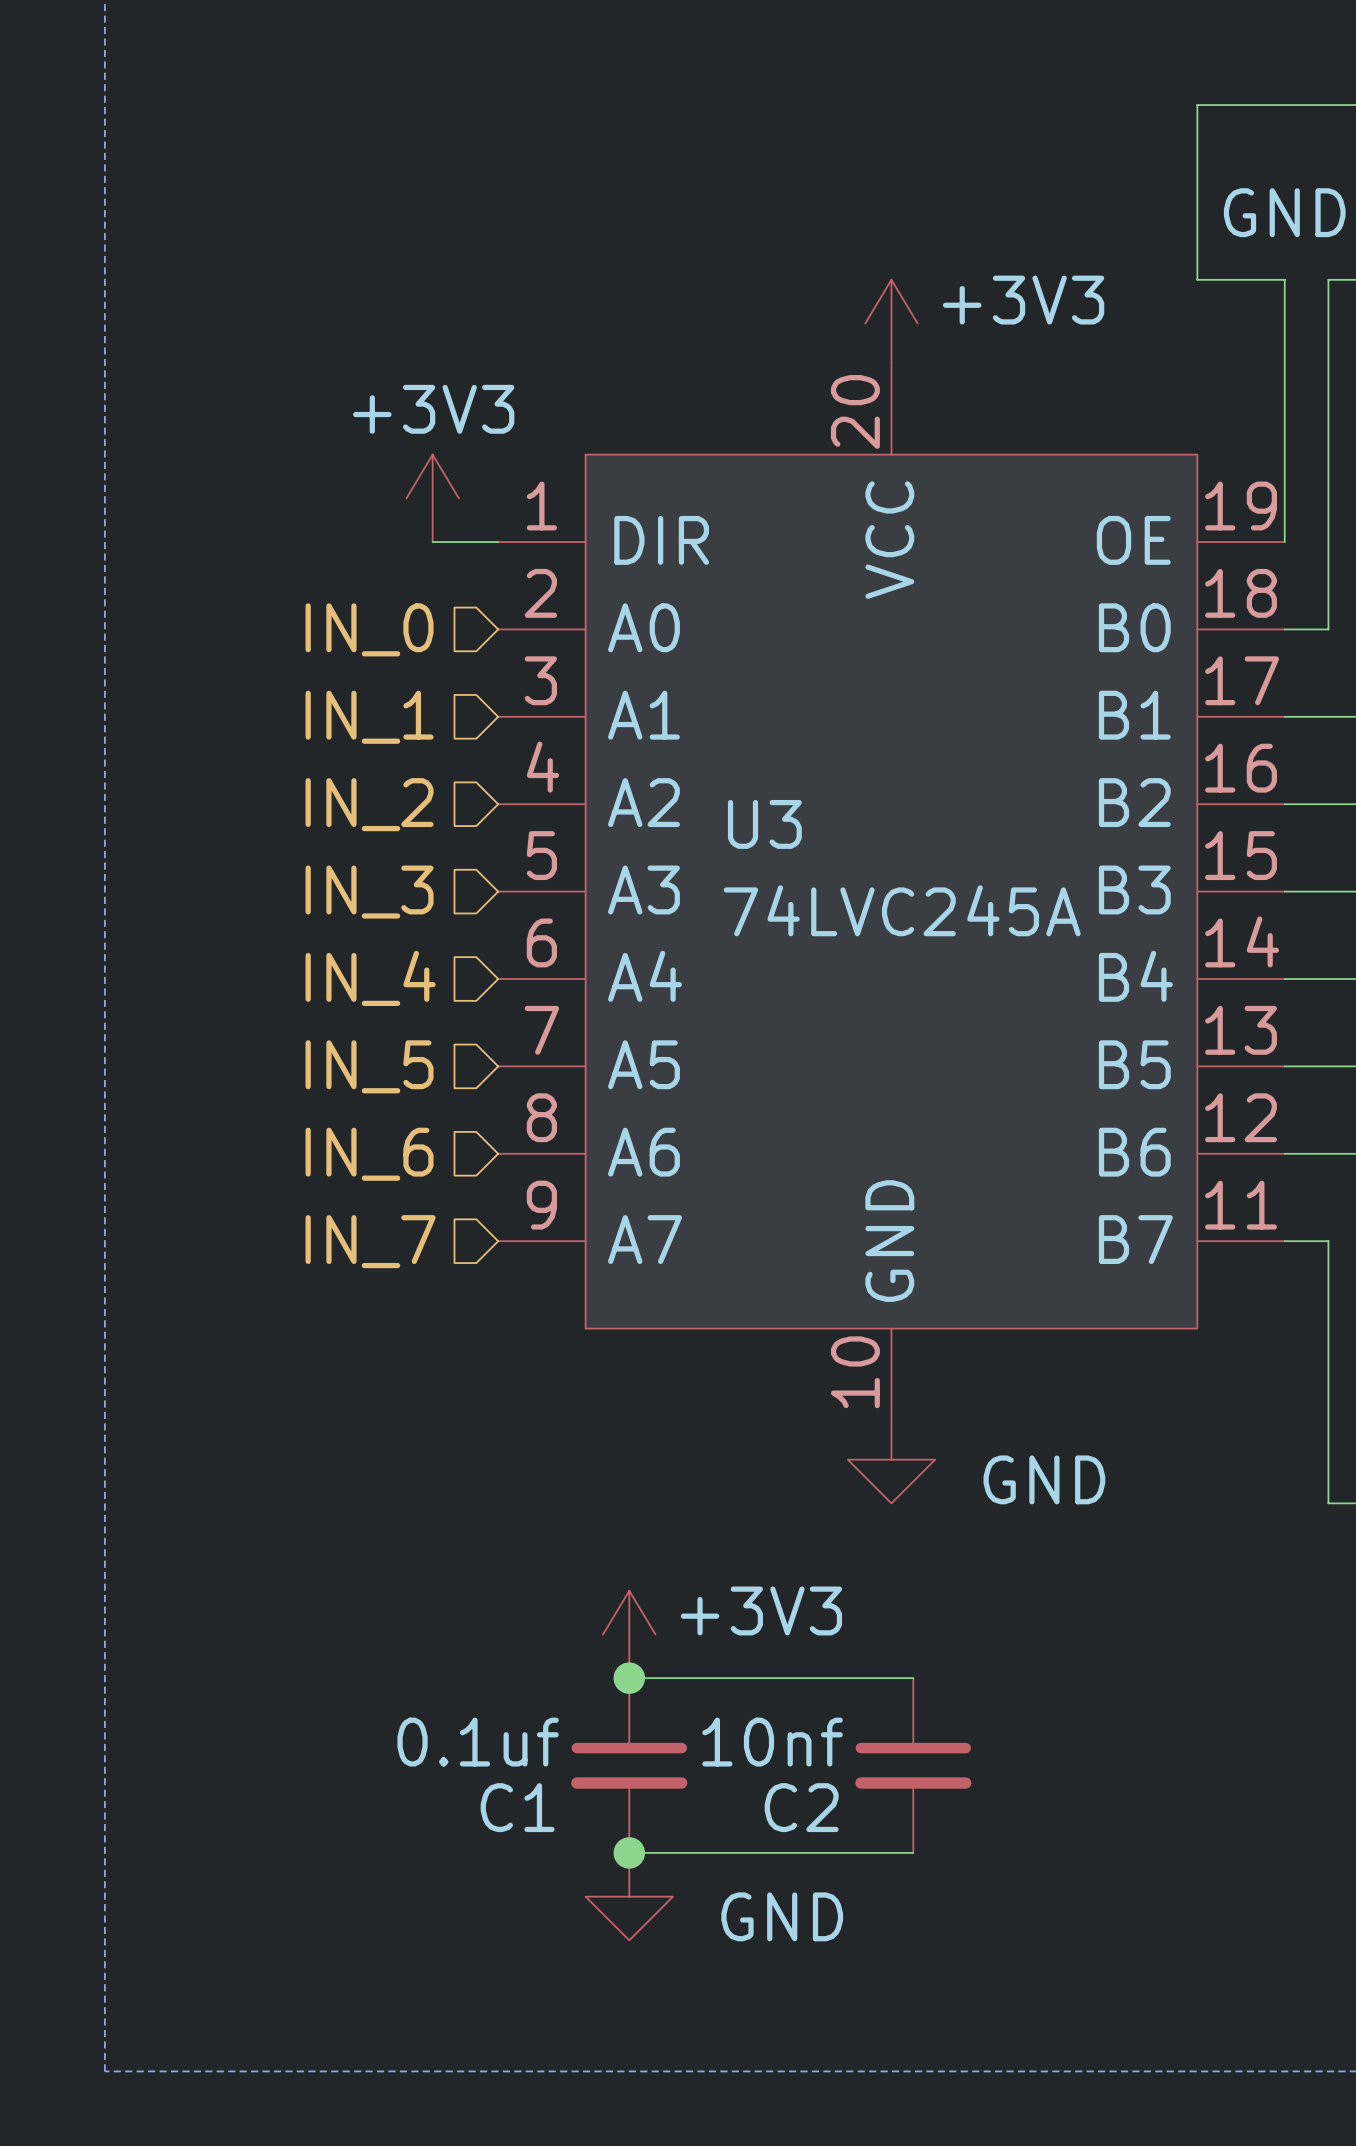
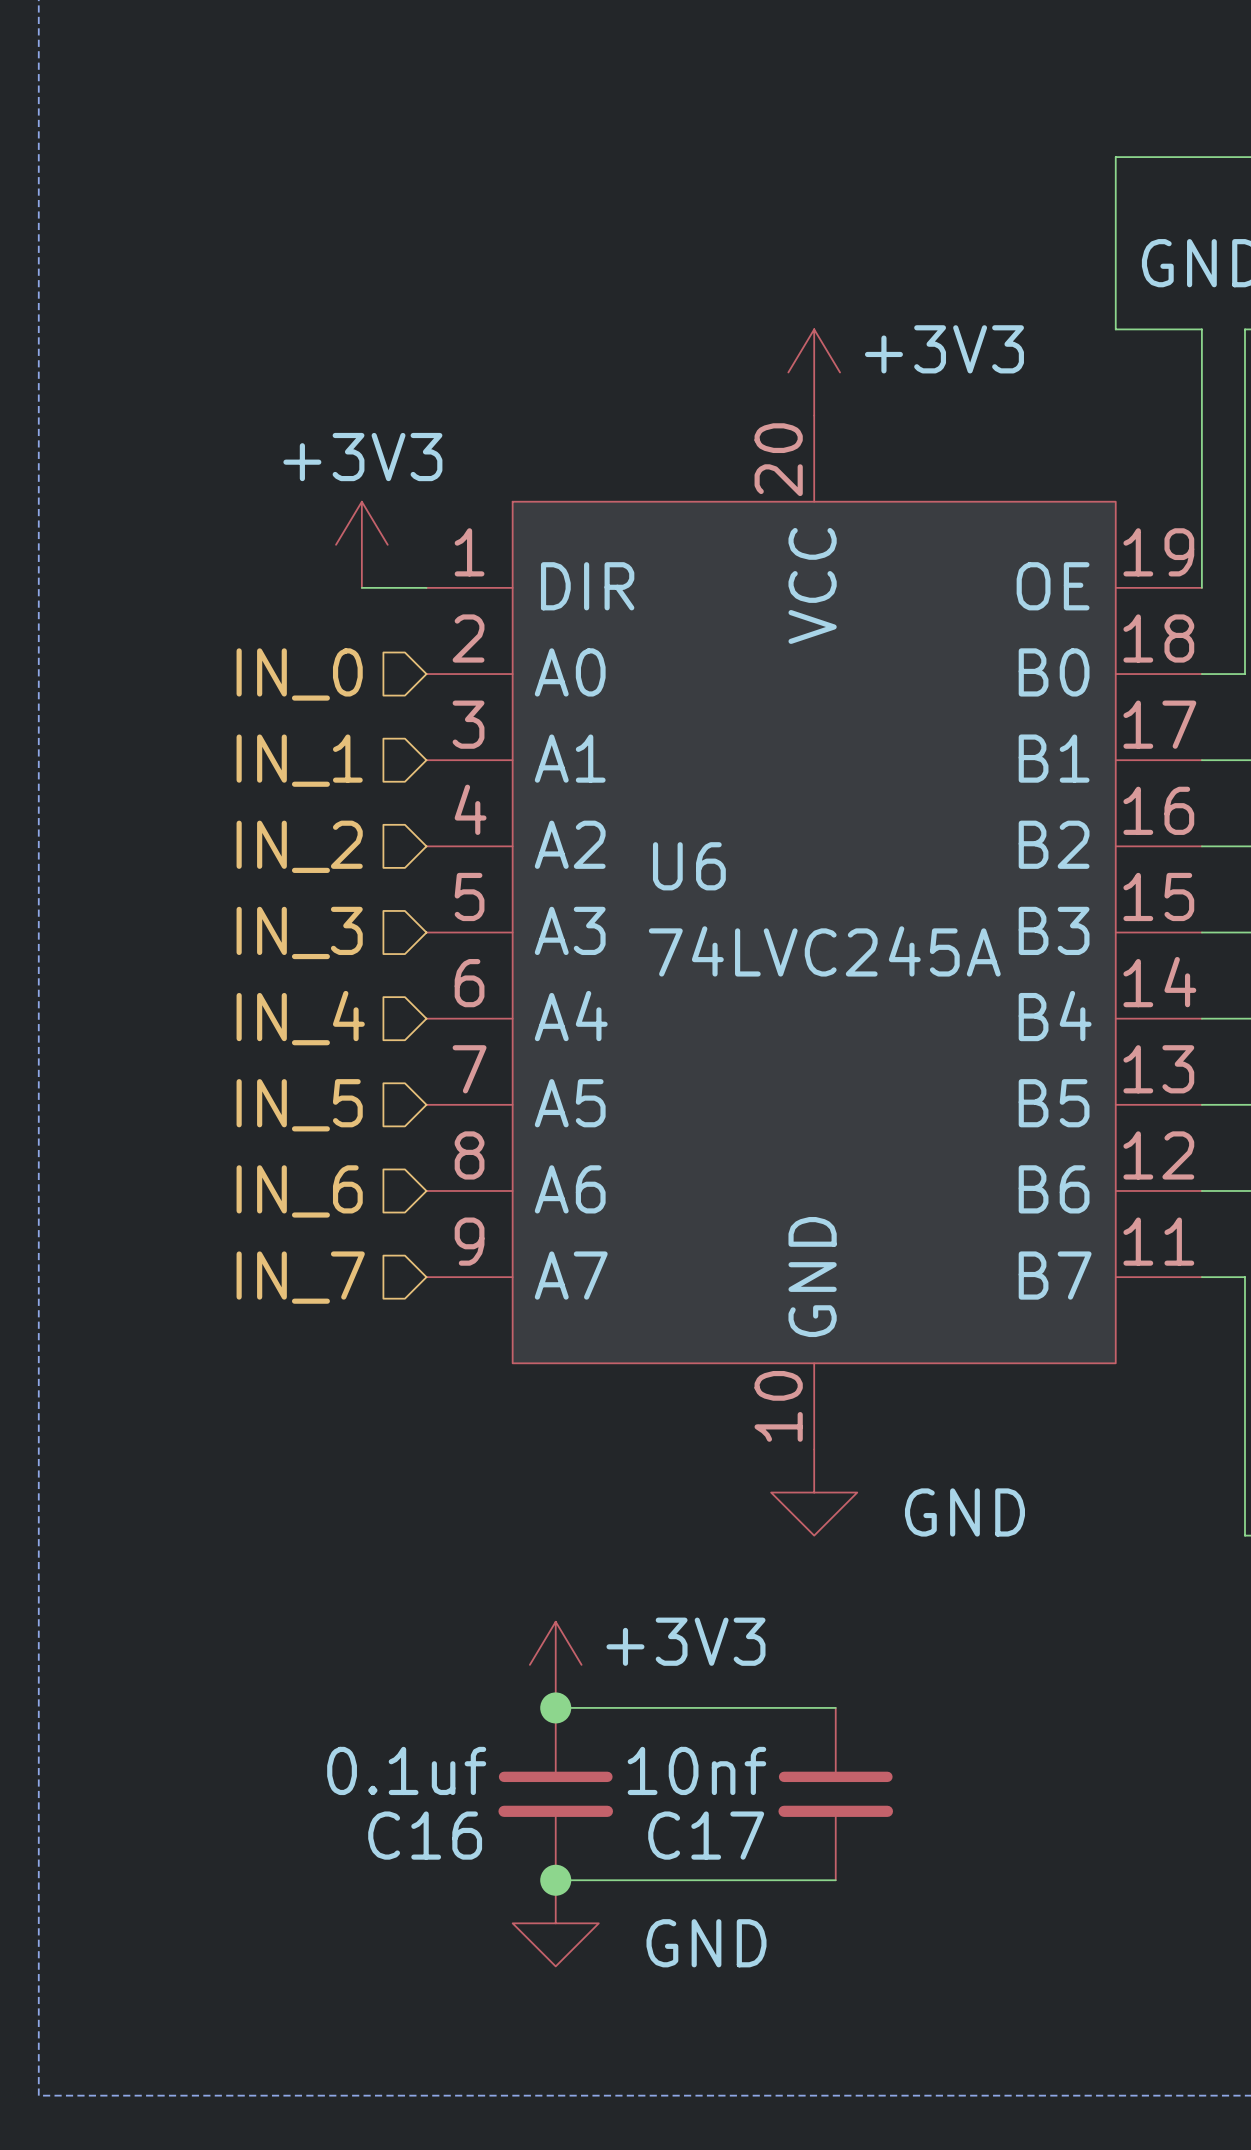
U3 name: U3 (764, 824) -> U6 (689, 866)
C1 name: C1 (517, 1807) -> C16 (425, 1835)
C2 name: C2 (801, 1807) -> C17 (706, 1835)

